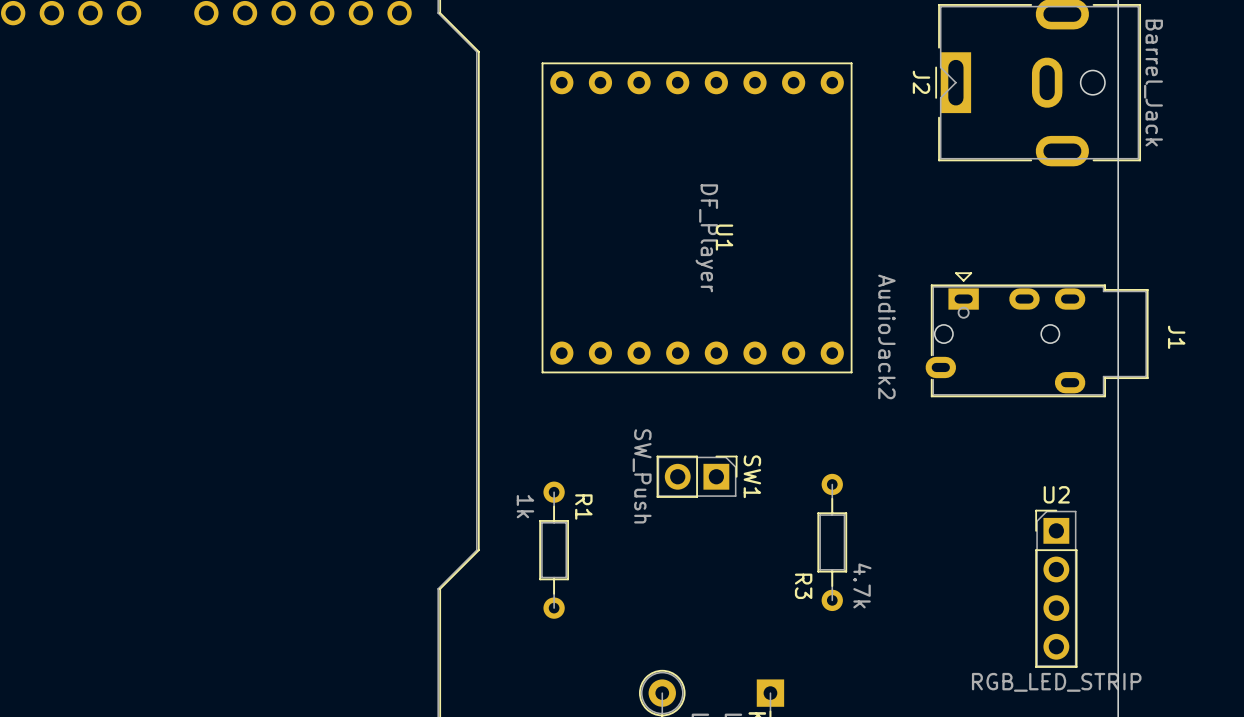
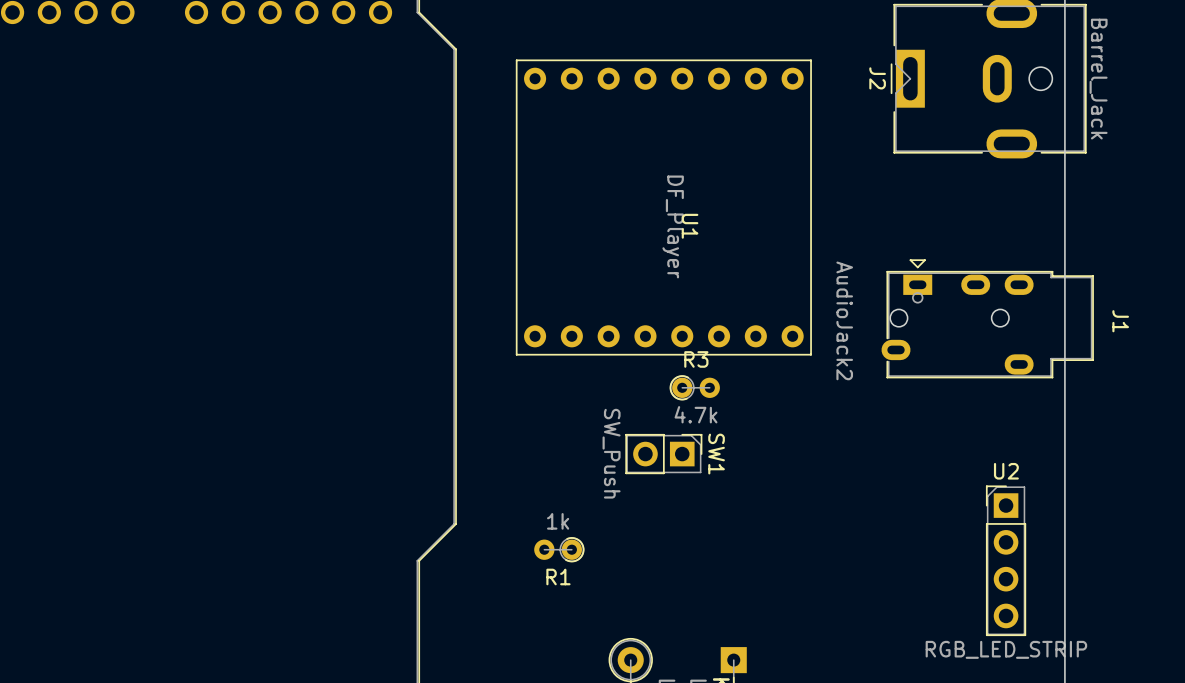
R3 footprint: [817, 473, 848, 612] -> [669, 375, 720, 401]
R1 footprint: [539, 481, 570, 619] -> [534, 537, 585, 563]
R1 value position: 1k (525, 506) -> 1k (558, 521)
R1 name position: R1 (583, 507) -> R1 (558, 576)
R3 value position: 4.7k (862, 585) -> 4.7k (696, 414)
R3 name position: R3 (803, 586) -> R3 (696, 359)

